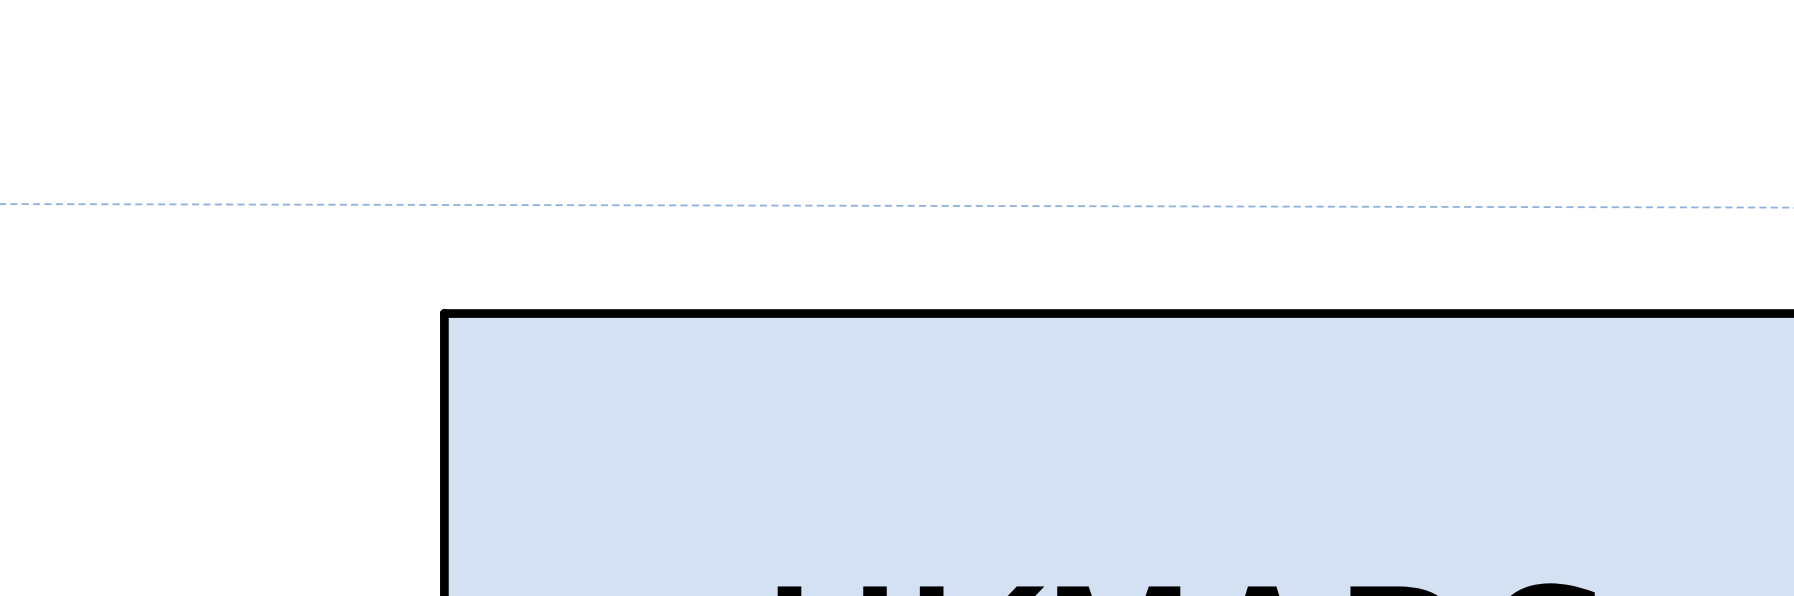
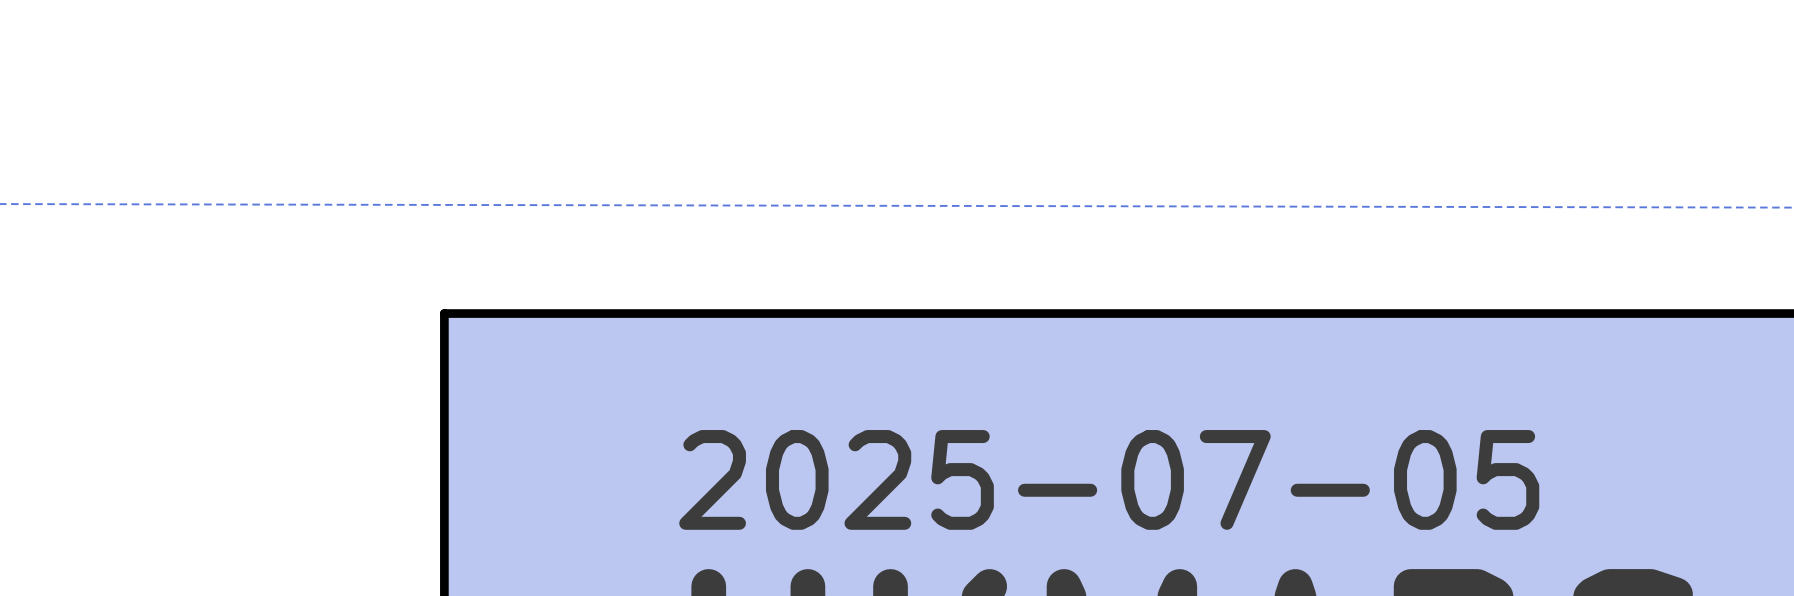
text: none -> 2025-07-05 (1109, 479)

